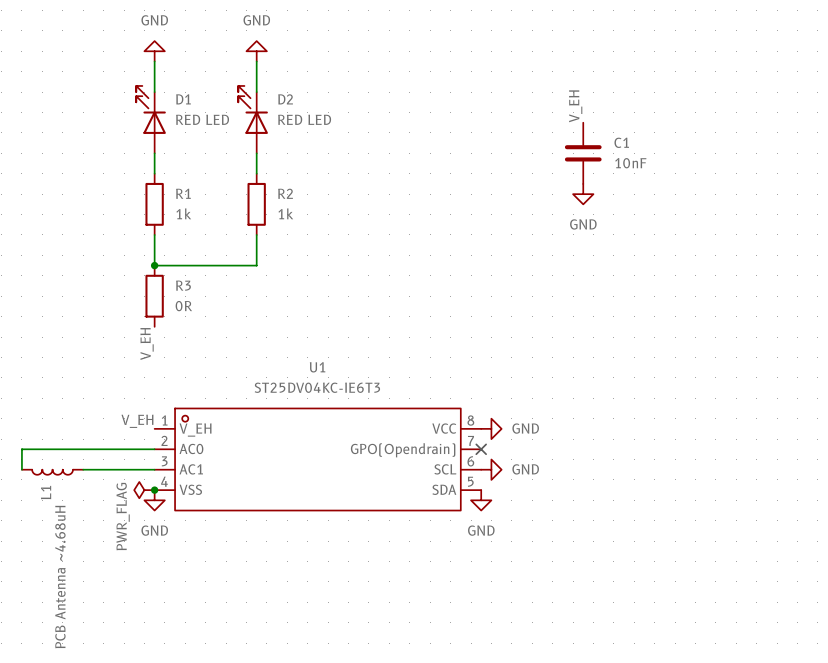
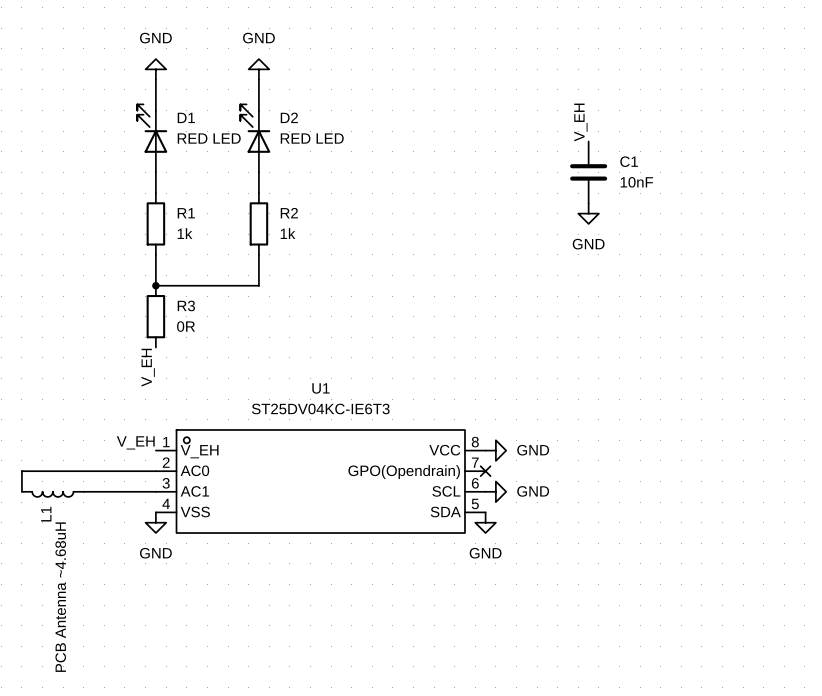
power symbol: PWR_FLAG (144, 490) -> none
junction: (154, 490) -> none

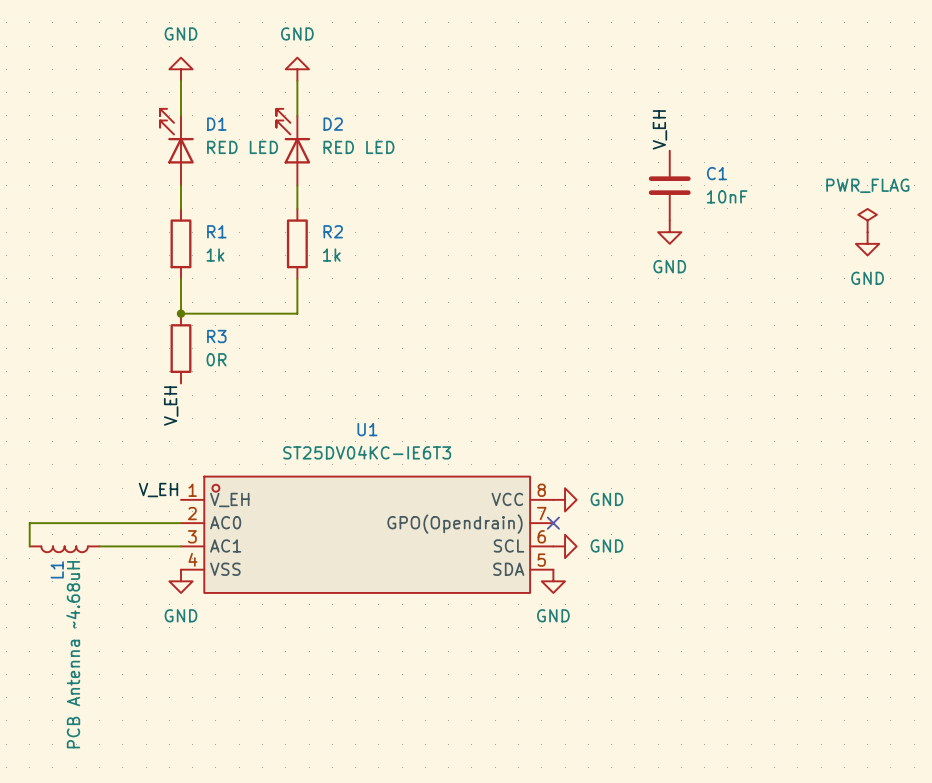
power symbol: none -> PWR_FLAG (867, 220)
power symbol: none -> GND (867, 243)

